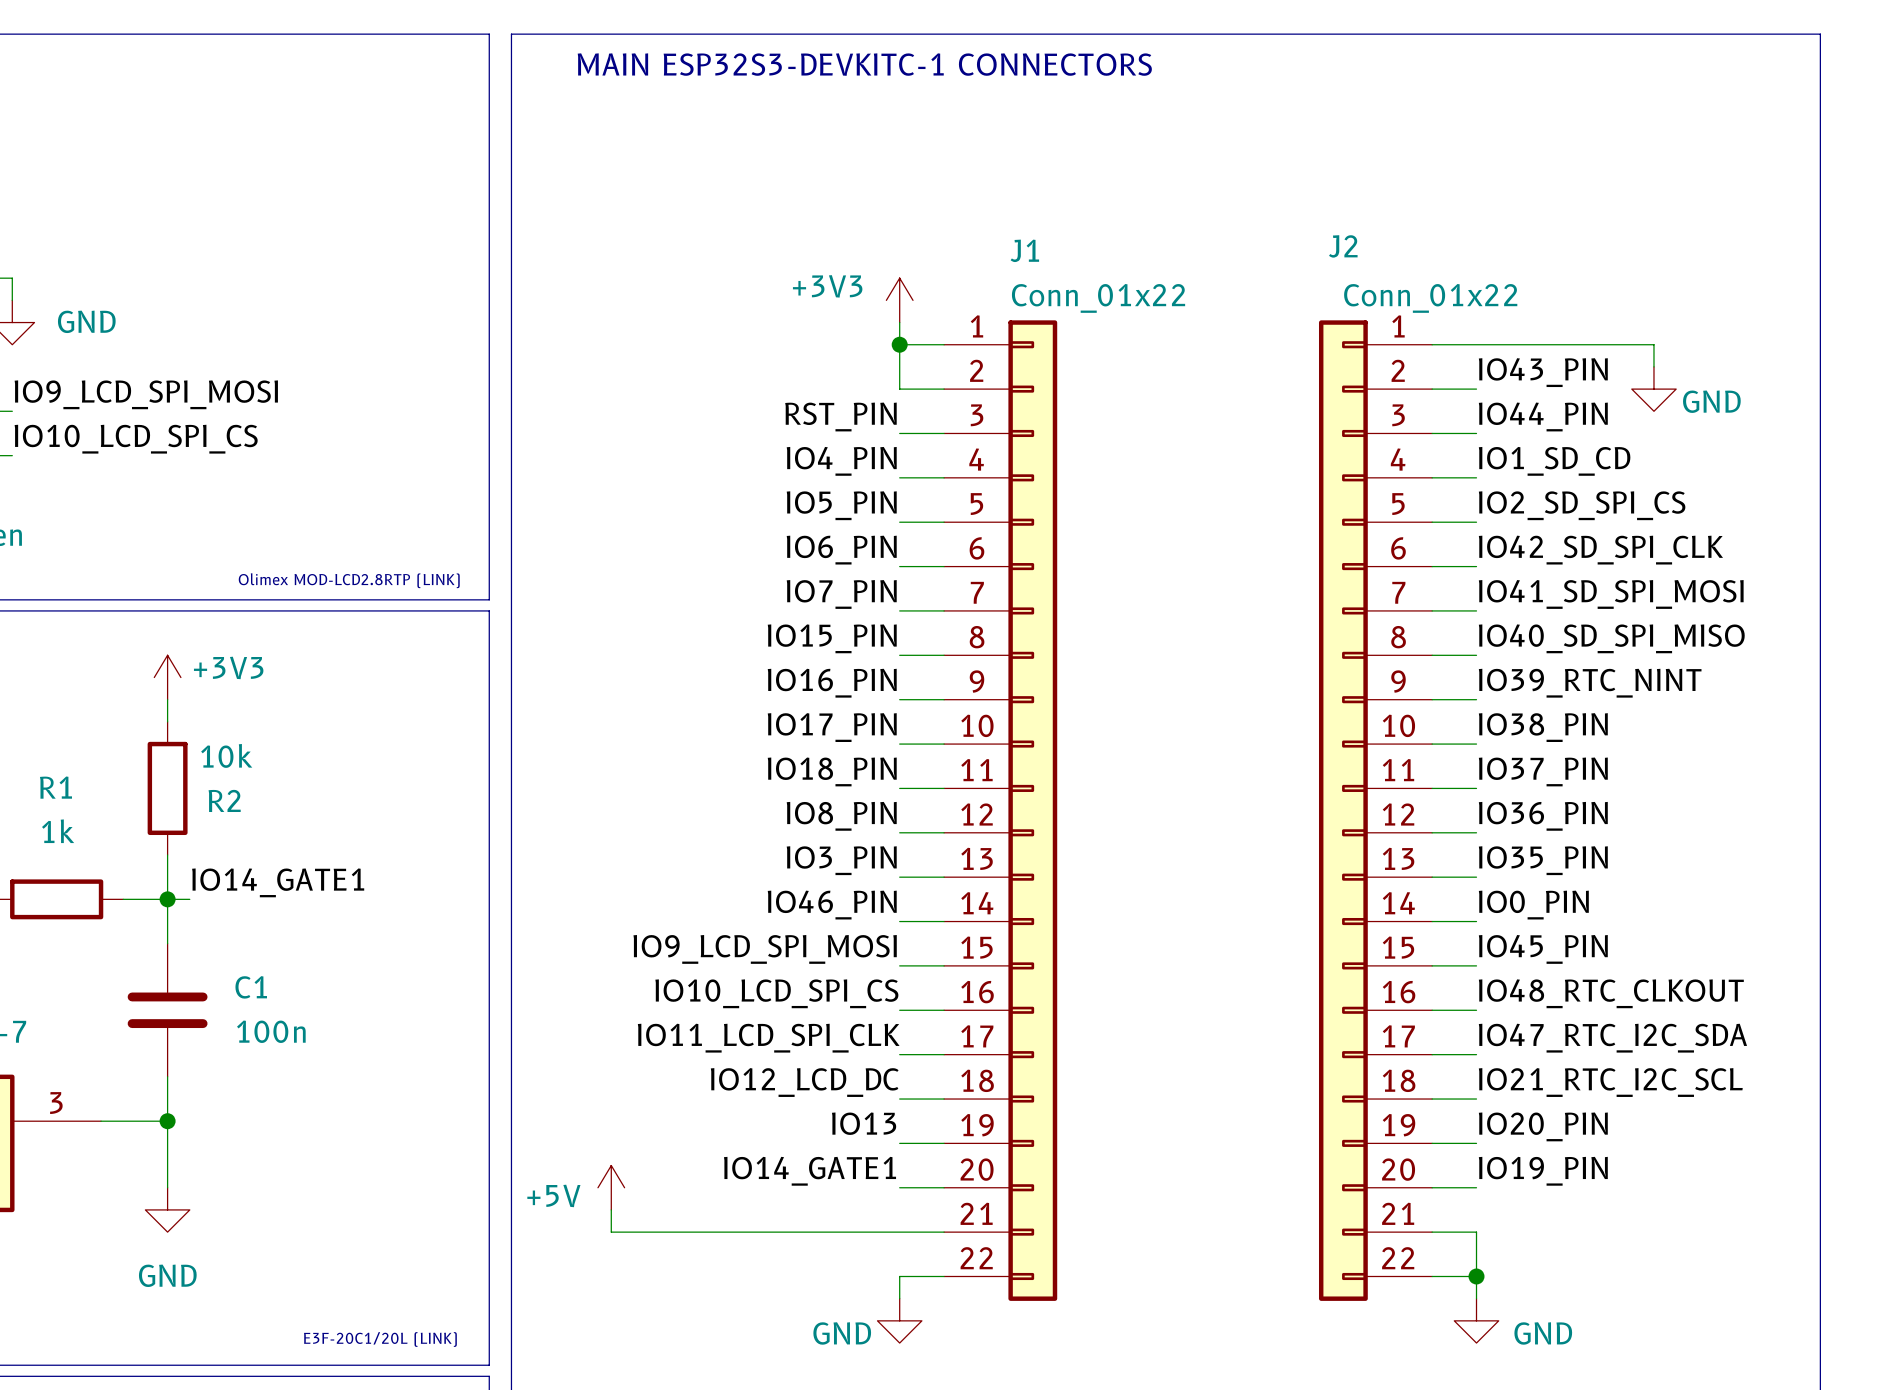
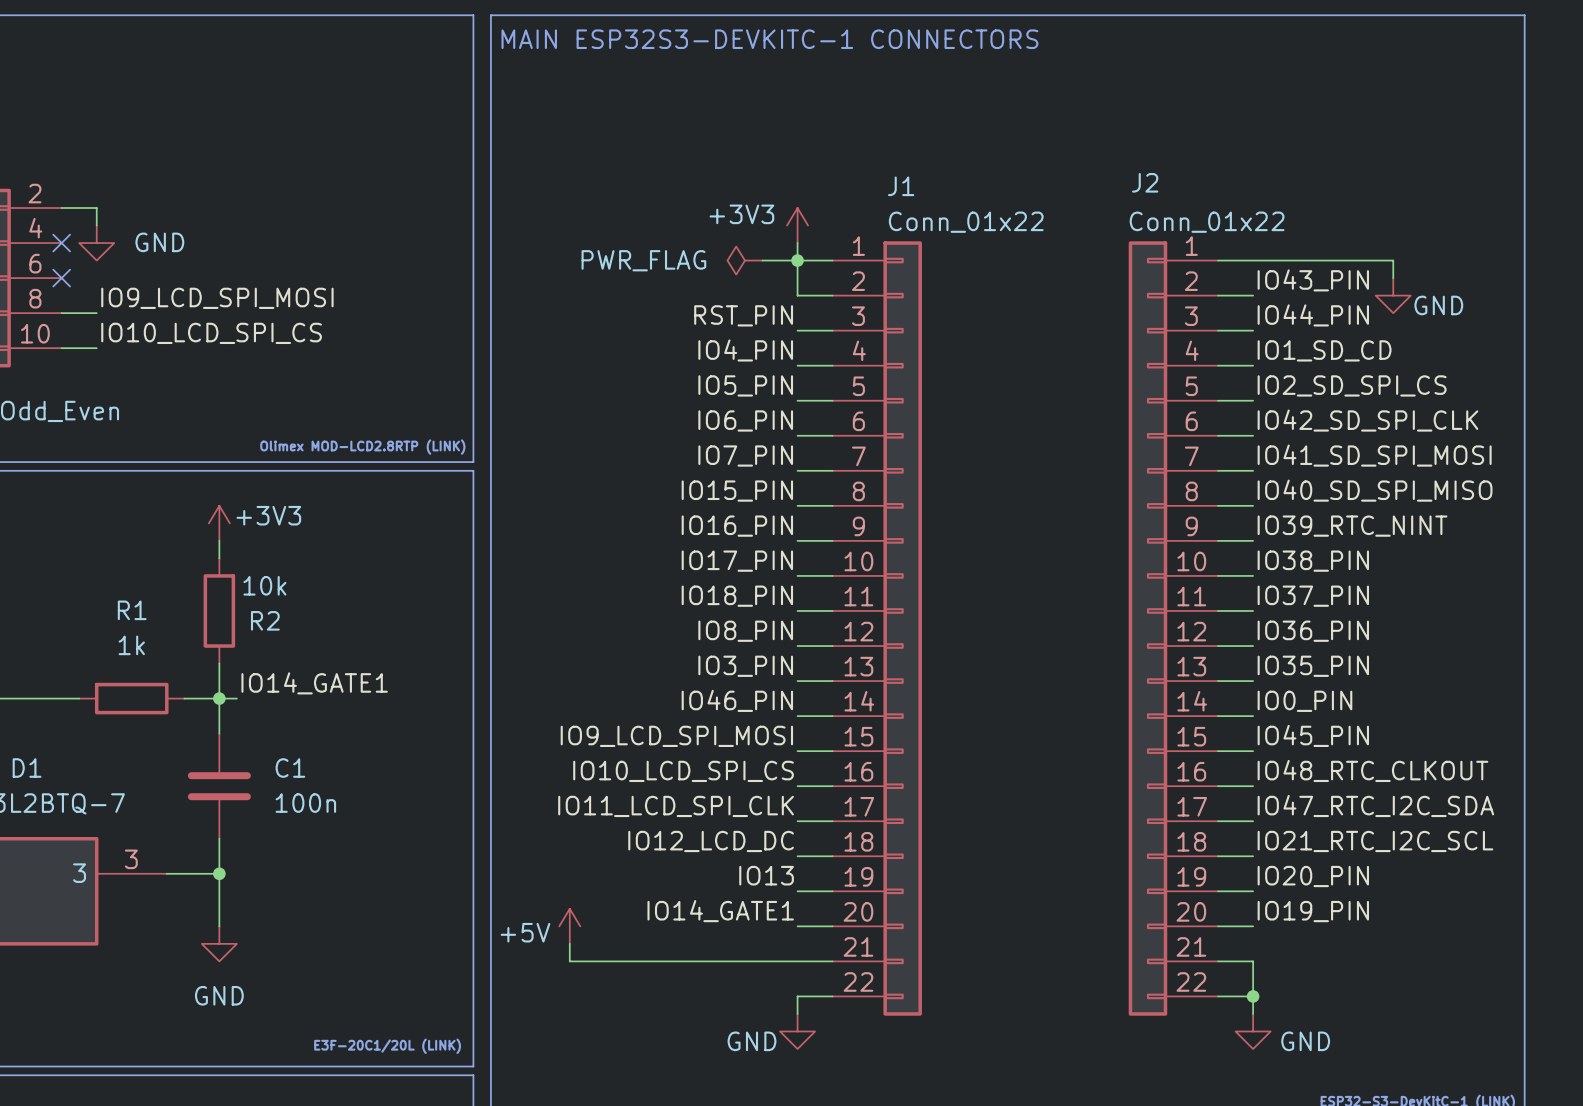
power symbol: none -> PWR_FLAG (744, 260)
wire: none -> (762, 260) (797, 260)

